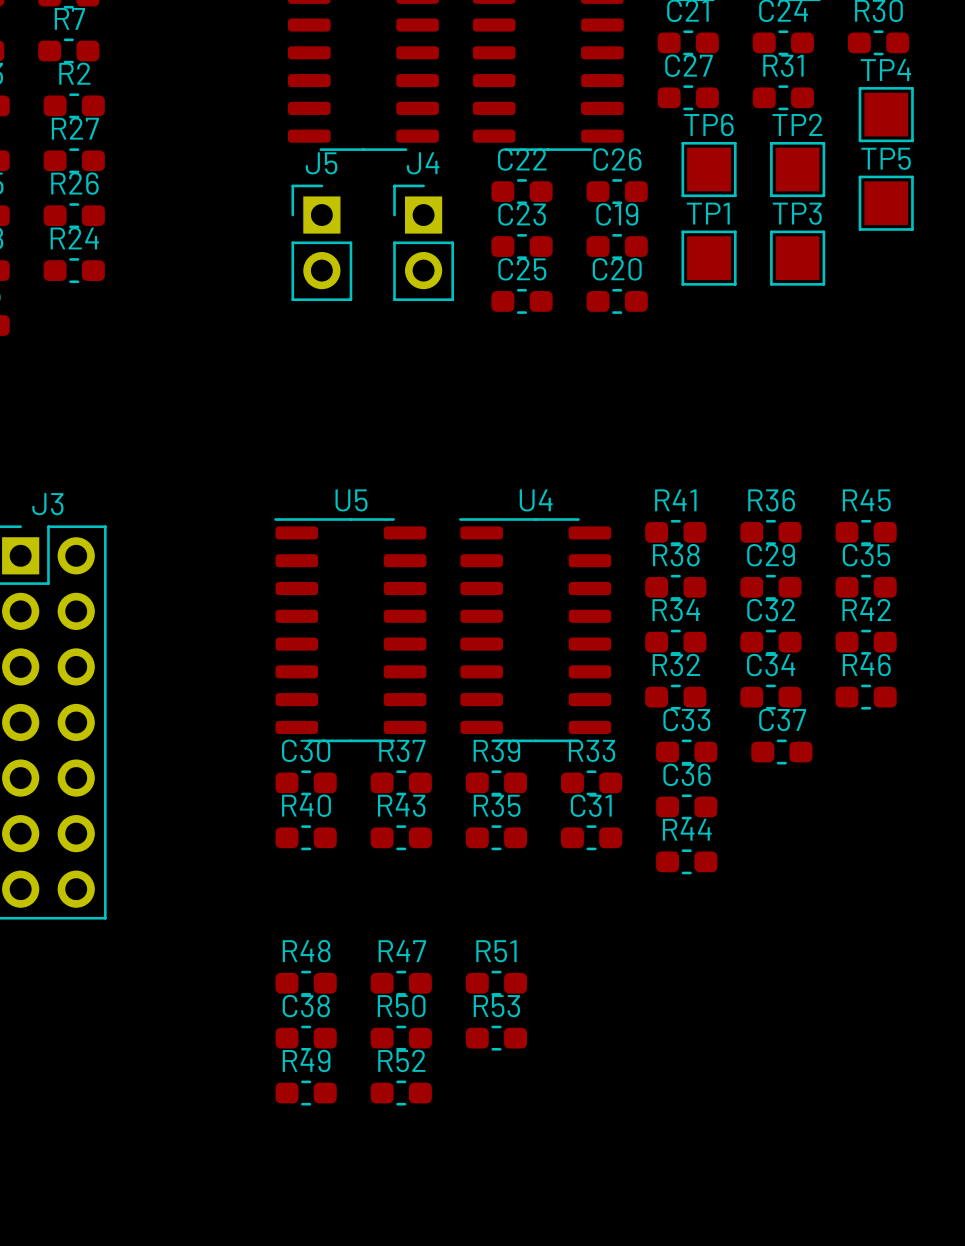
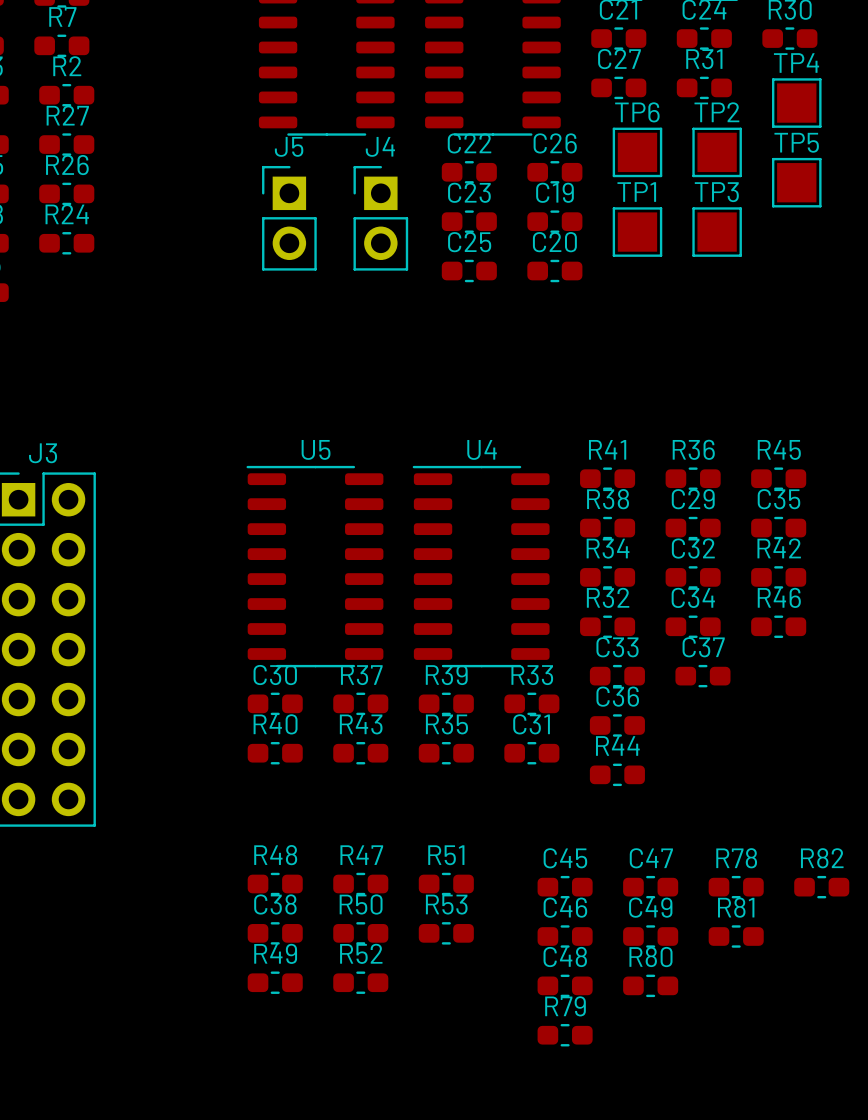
C45: none -> (565, 887)
C47: none -> (650, 887)
R78: none -> (736, 887)
R82: none -> (821, 887)
C46: none -> (565, 936)
C49: none -> (650, 936)
R81: none -> (736, 936)
C48: none -> (565, 985)
R80: none -> (650, 985)
R79: none -> (565, 1035)

